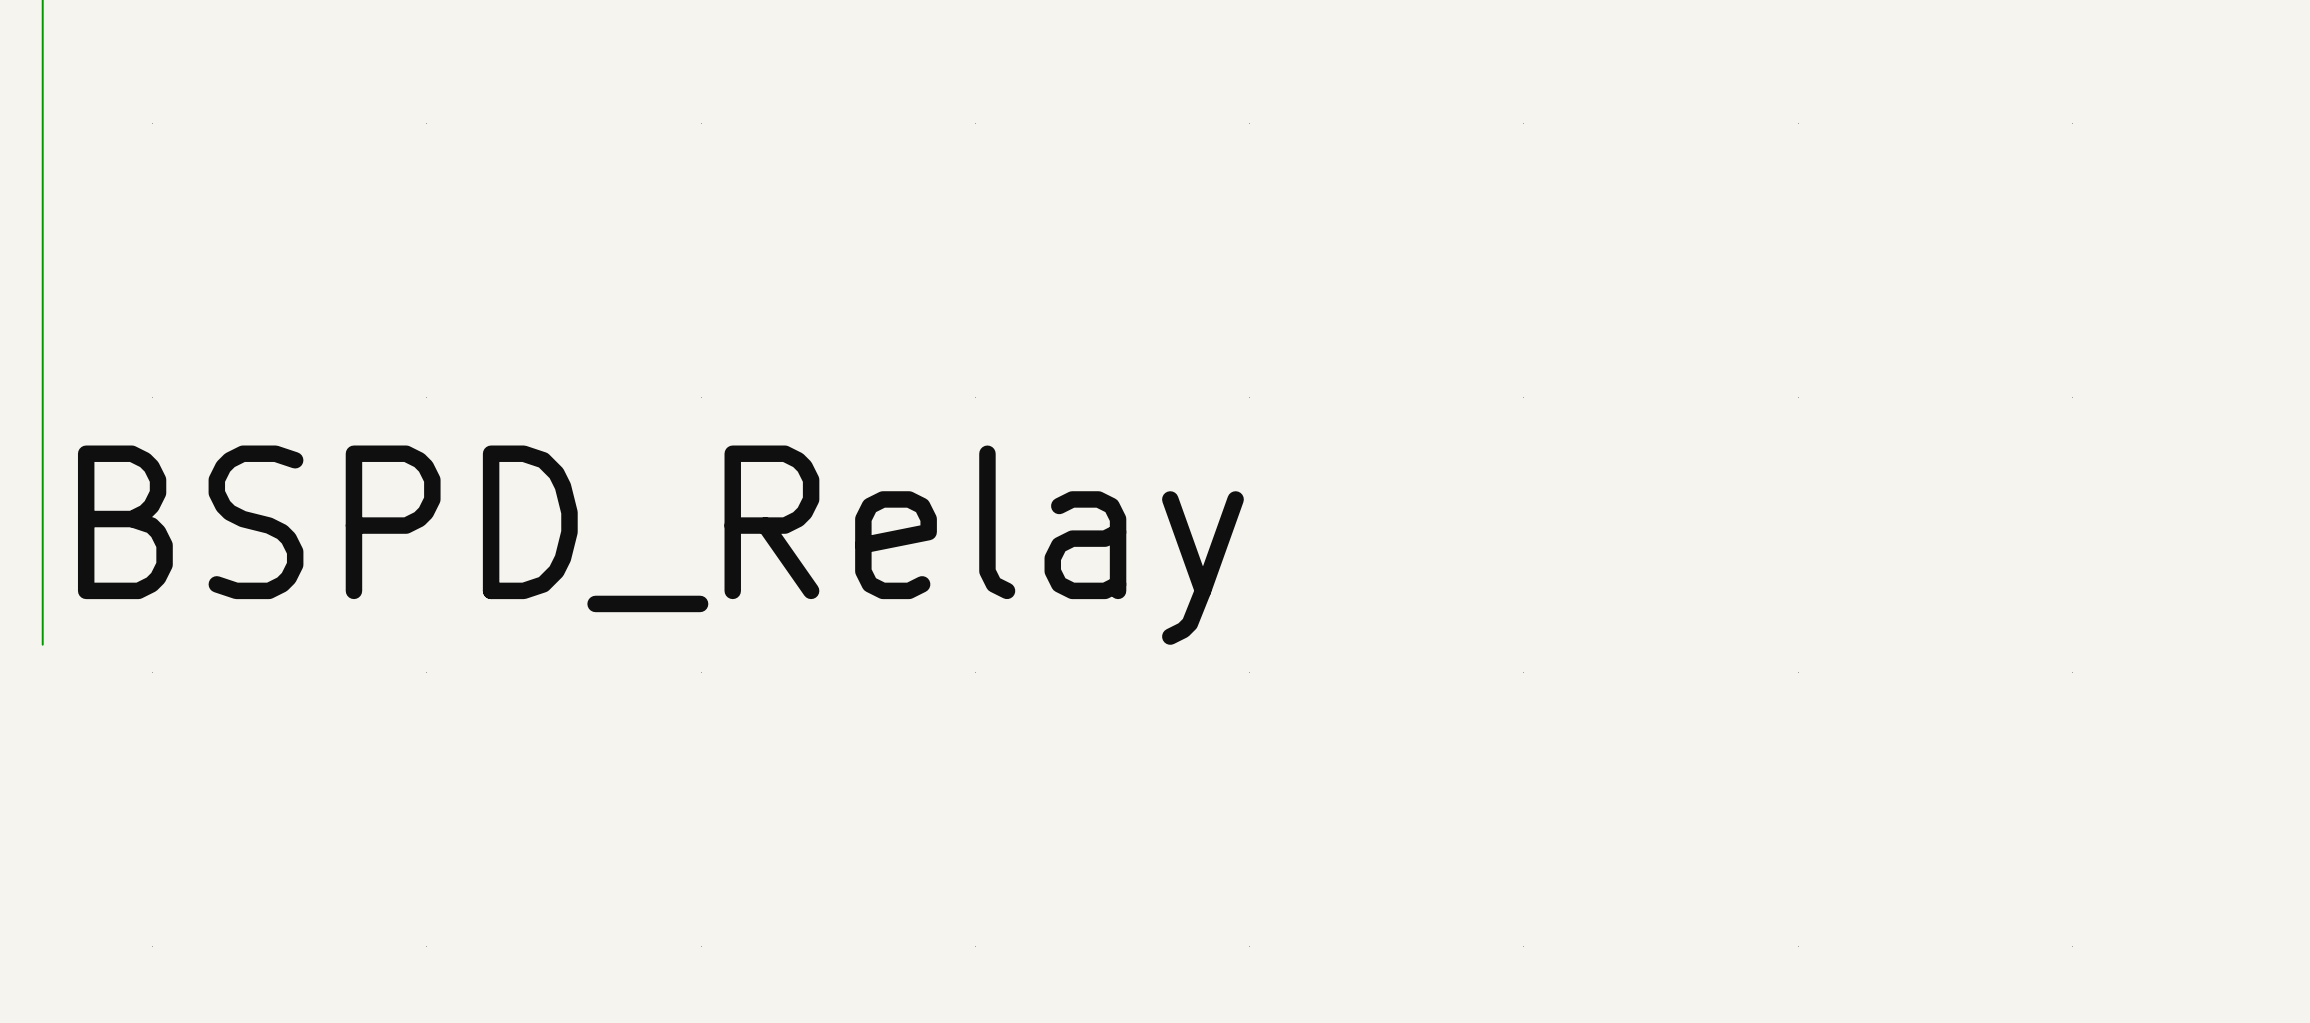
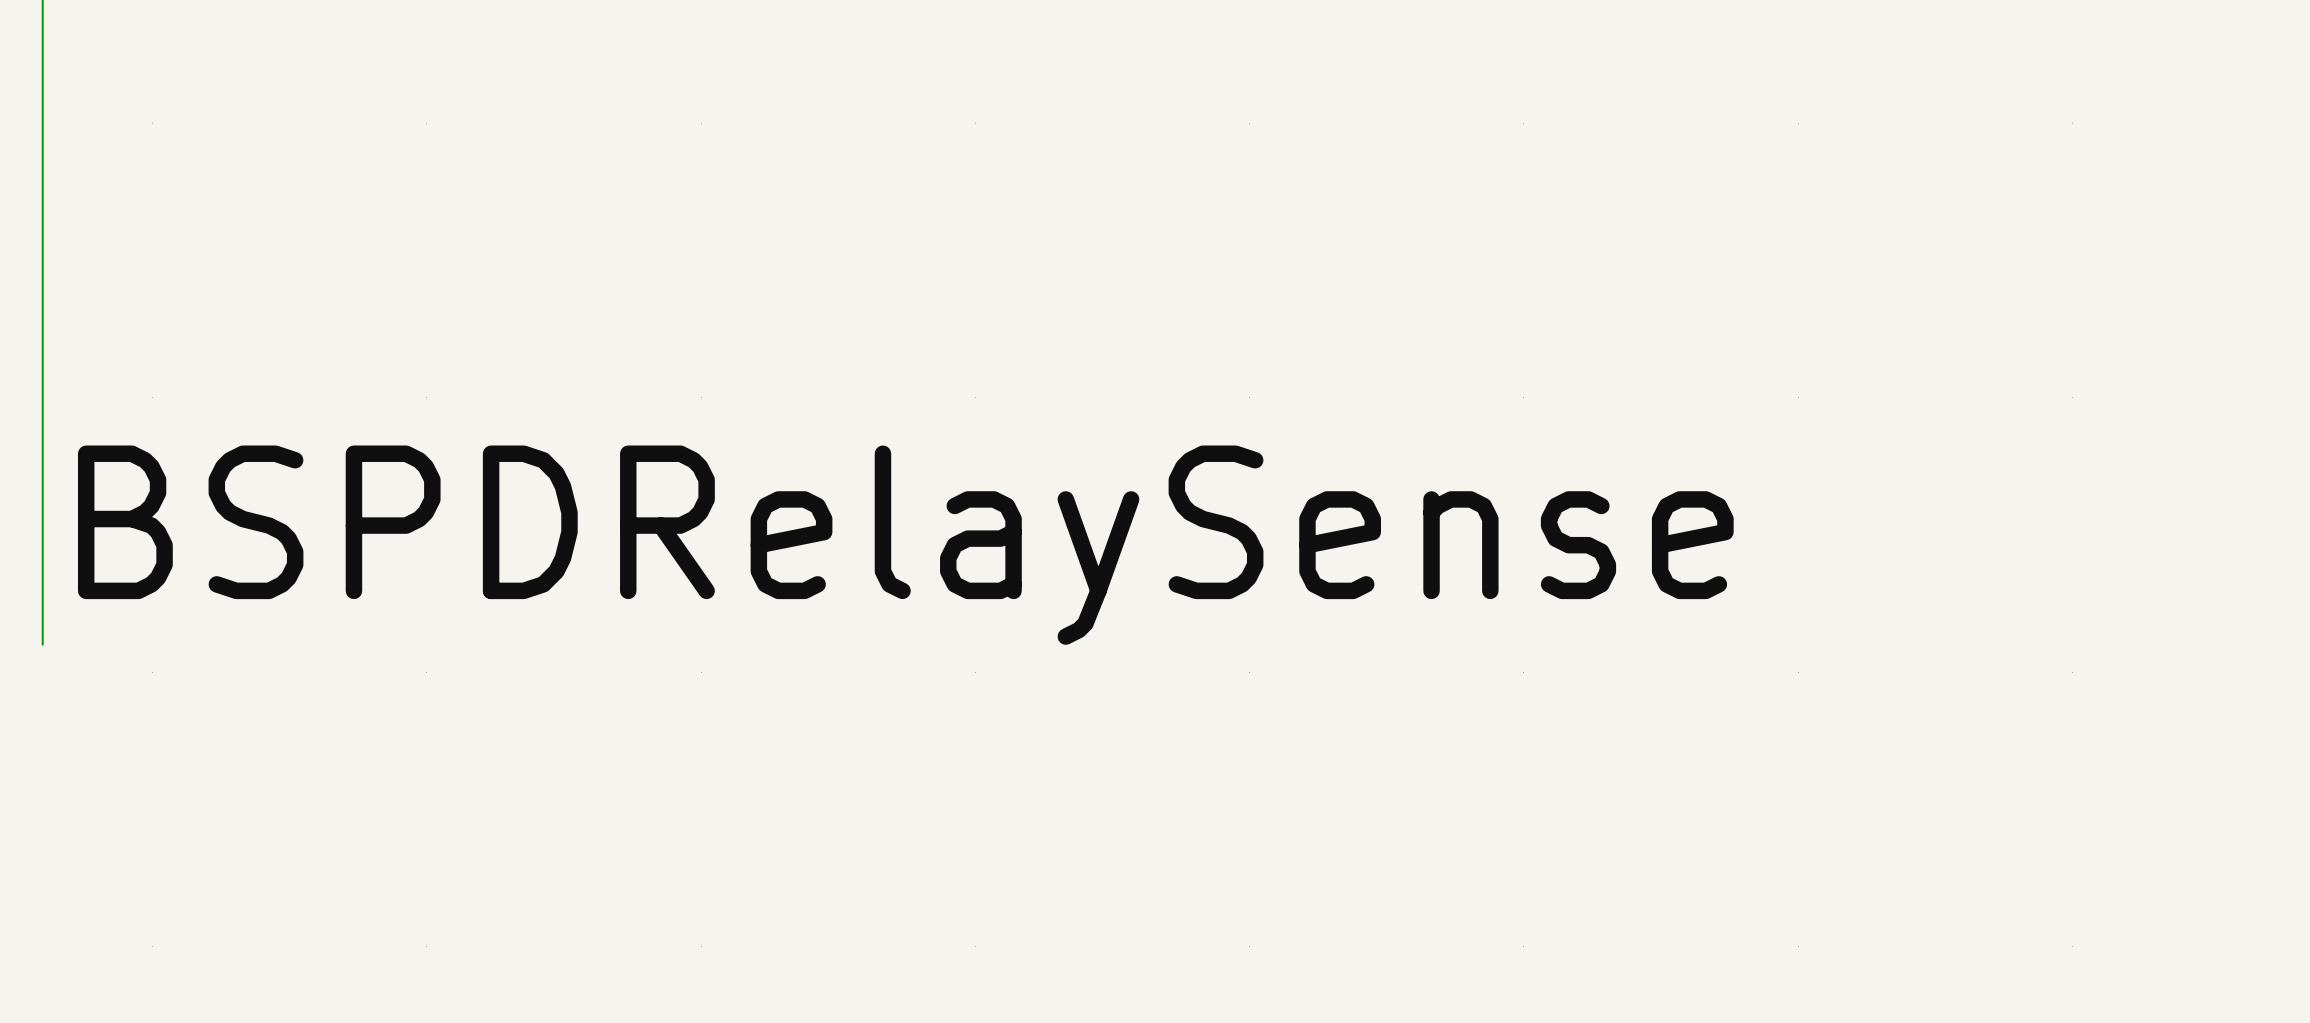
label: BSPD_Relay (660, 545) -> BSPDRelaySense (905, 545)

